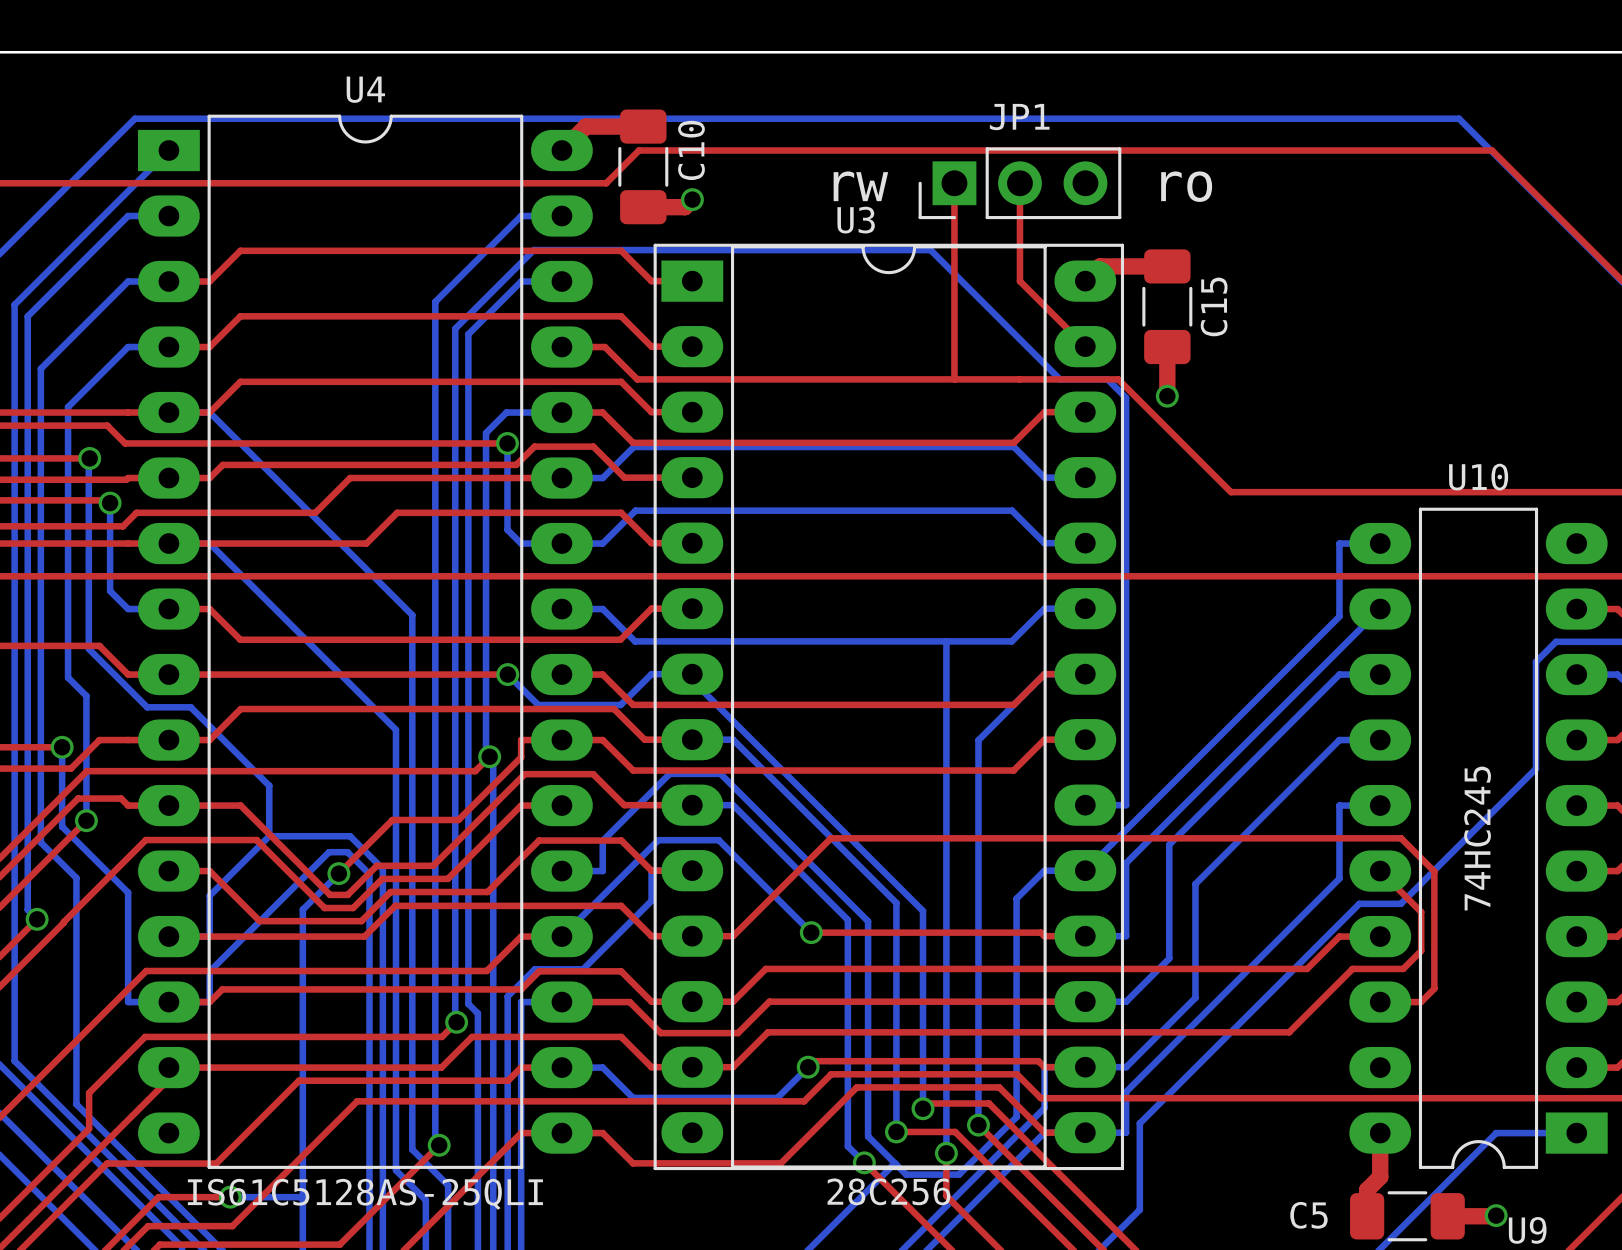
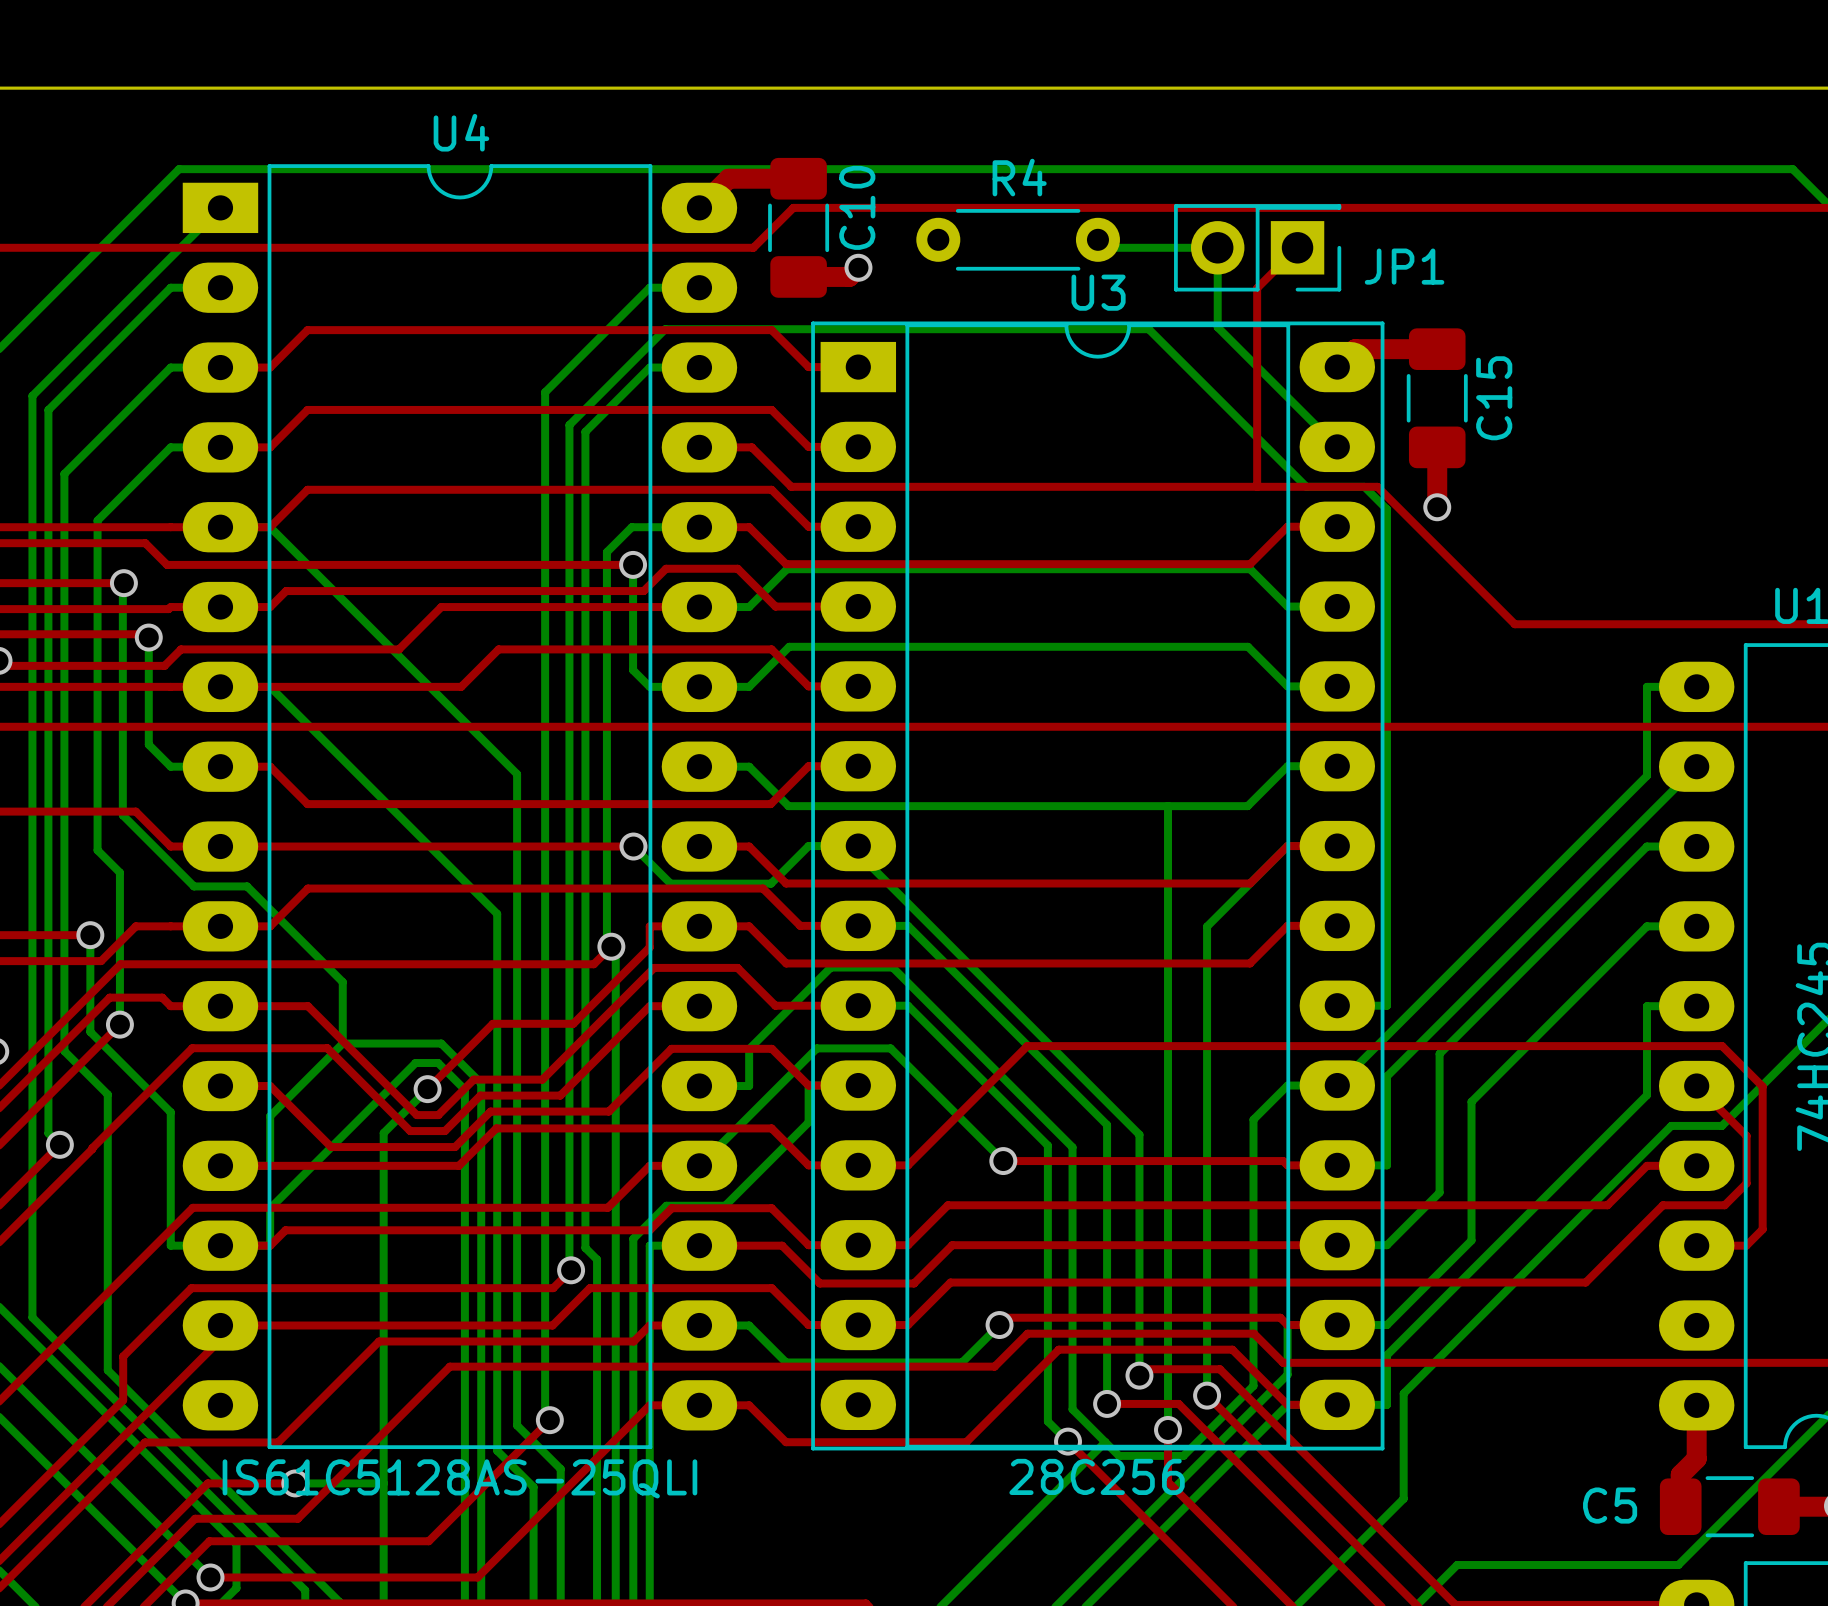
JP1 name position: JP1 (1019, 117) -> JP1 (1404, 266)
JP1 footprint: [918, 147, 1122, 220] -> [1174, 204, 1342, 292]
R4: none -> (1018, 239)
bottom track: none -> (1097, 239) (1105, 247) (1217, 247) (1217, 327) (1337, 446)
top track: (954, 183) (954, 379) -> none
top track: (1019, 183) (1019, 281) (1085, 346) -> none
top track: none -> (1297, 247) (1257, 288) (1257, 486)
text: rw (860, 186) -> none
text: ro (1186, 186) -> none
U3 name position: U3 (856, 220) -> U3 (1098, 292)

